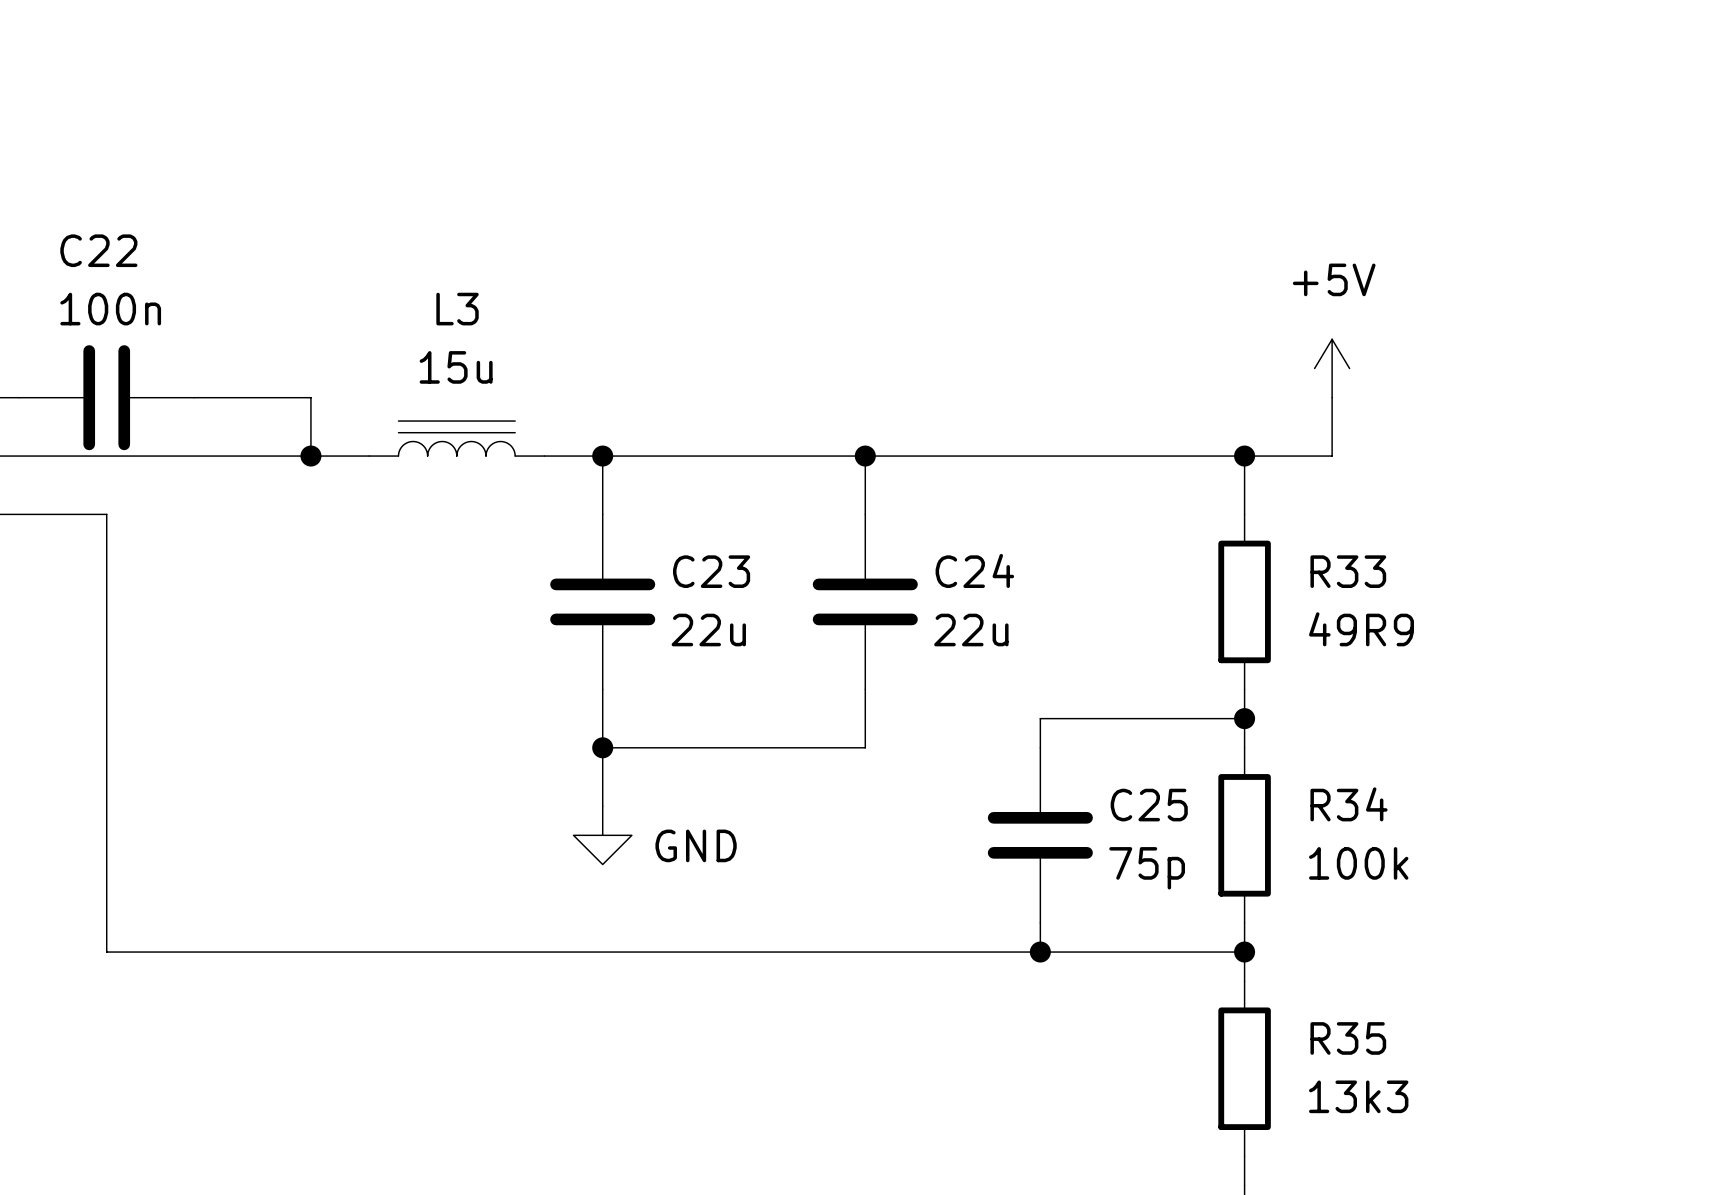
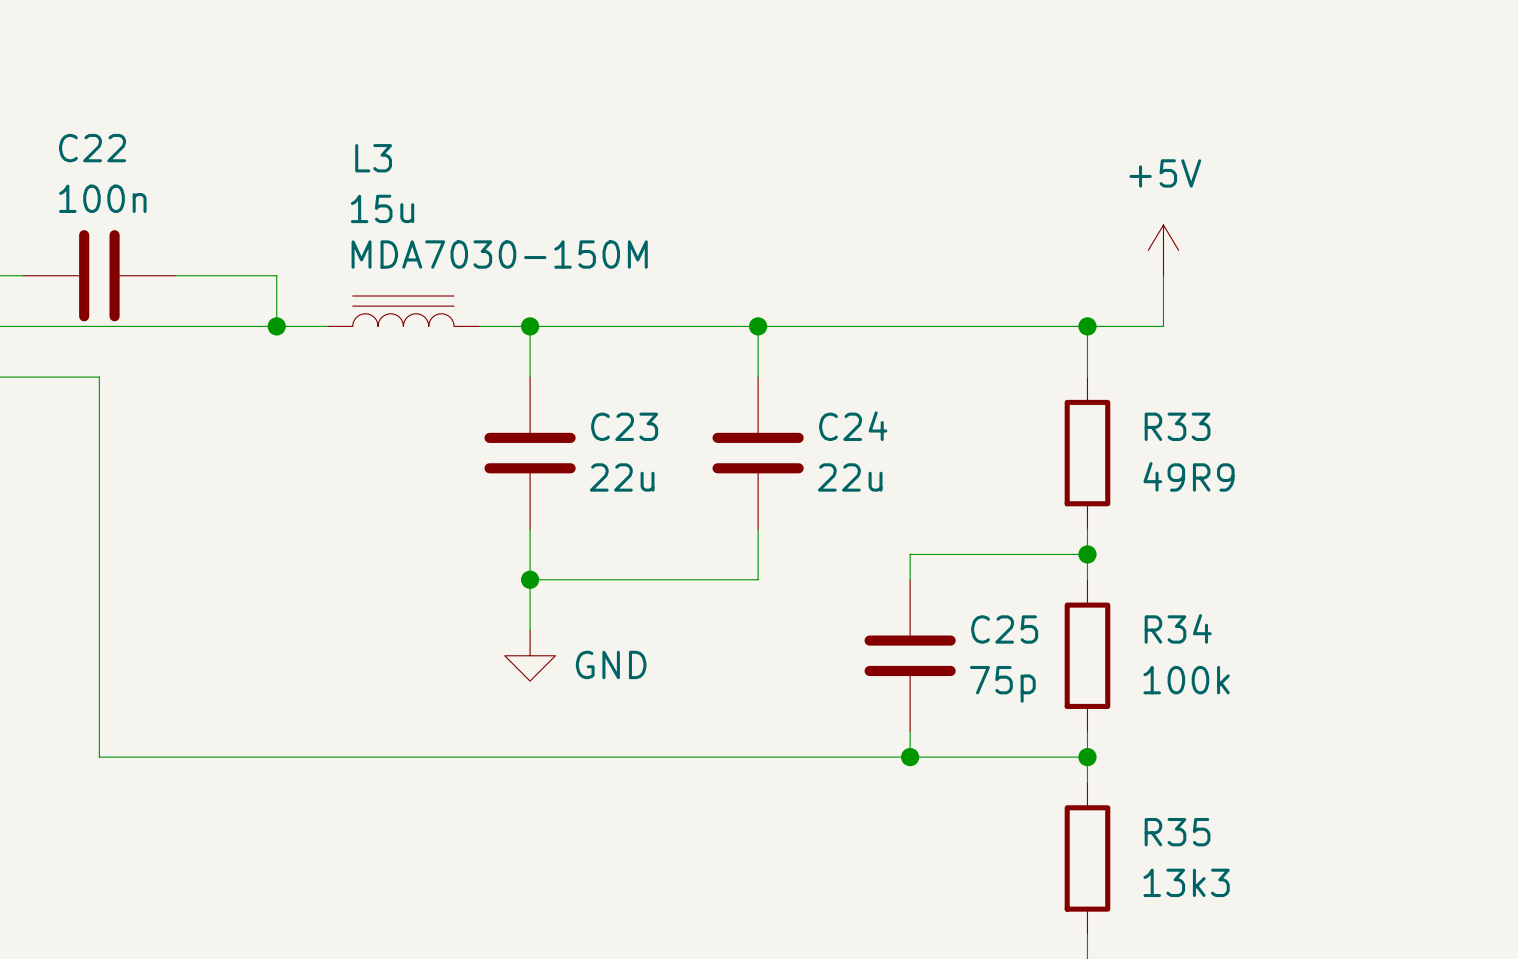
L3 name position: L3 (457, 309) -> L3 (373, 158)
L3 value position: 15u (456, 367) -> 15u (382, 208)
L3 text: none -> MDA7030-150M (499, 254)

